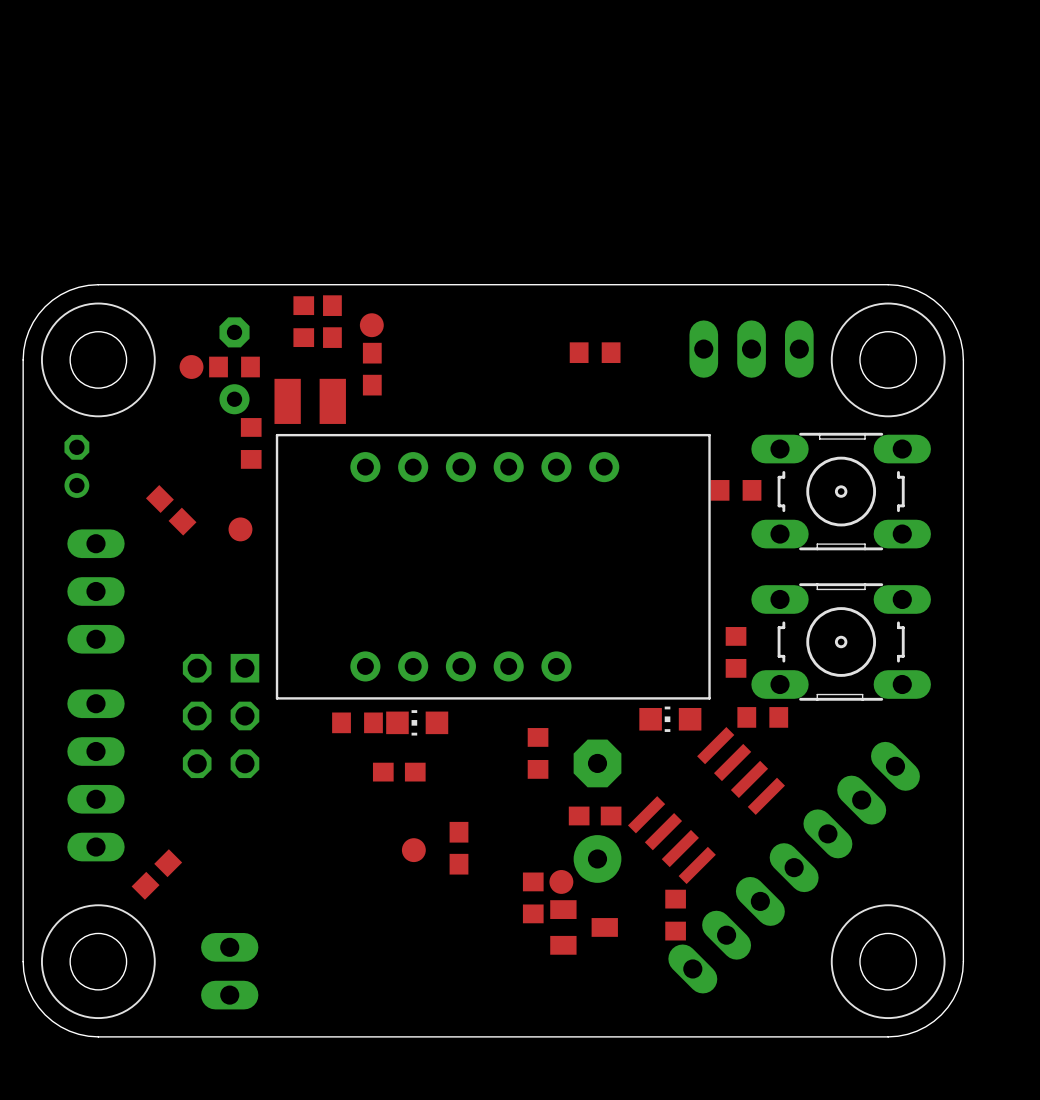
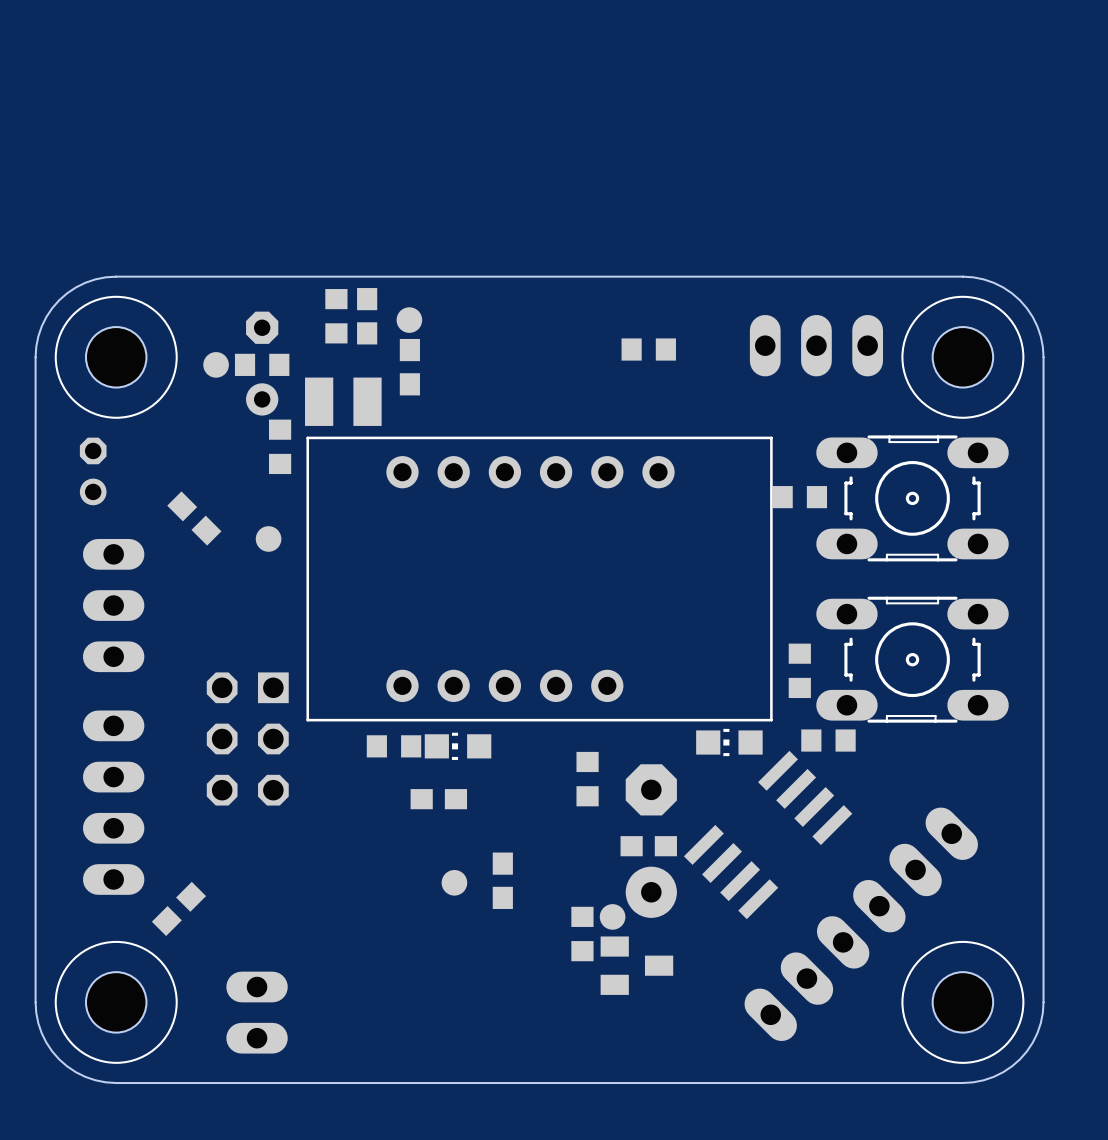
part: (794, 867) -> none
part: none -> (861, 924)
part: (675, 915) -> none

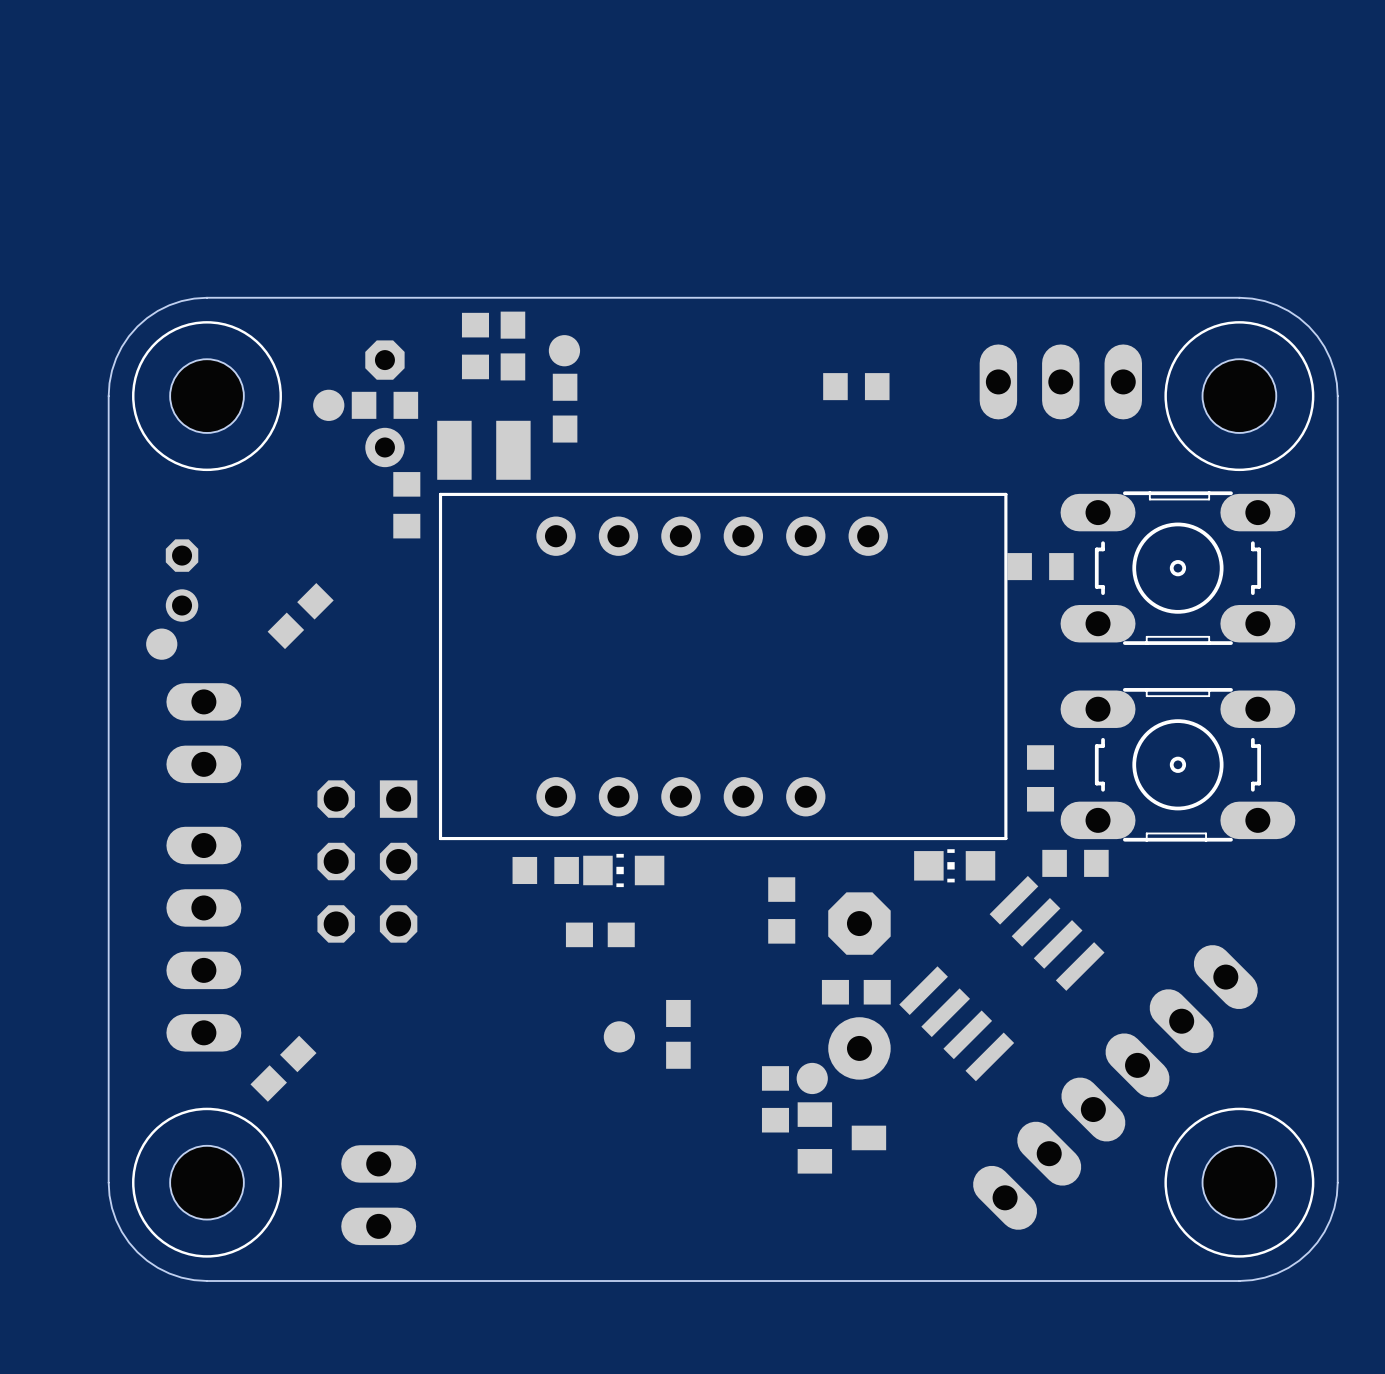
part position: (93, 471) -> (182, 580)
part rotation: 0° (194, 518) -> 90° clockwise (300, 616)
part position: (268, 538) -> (161, 644)
part: (113, 605) -> none
part: none -> (203, 733)

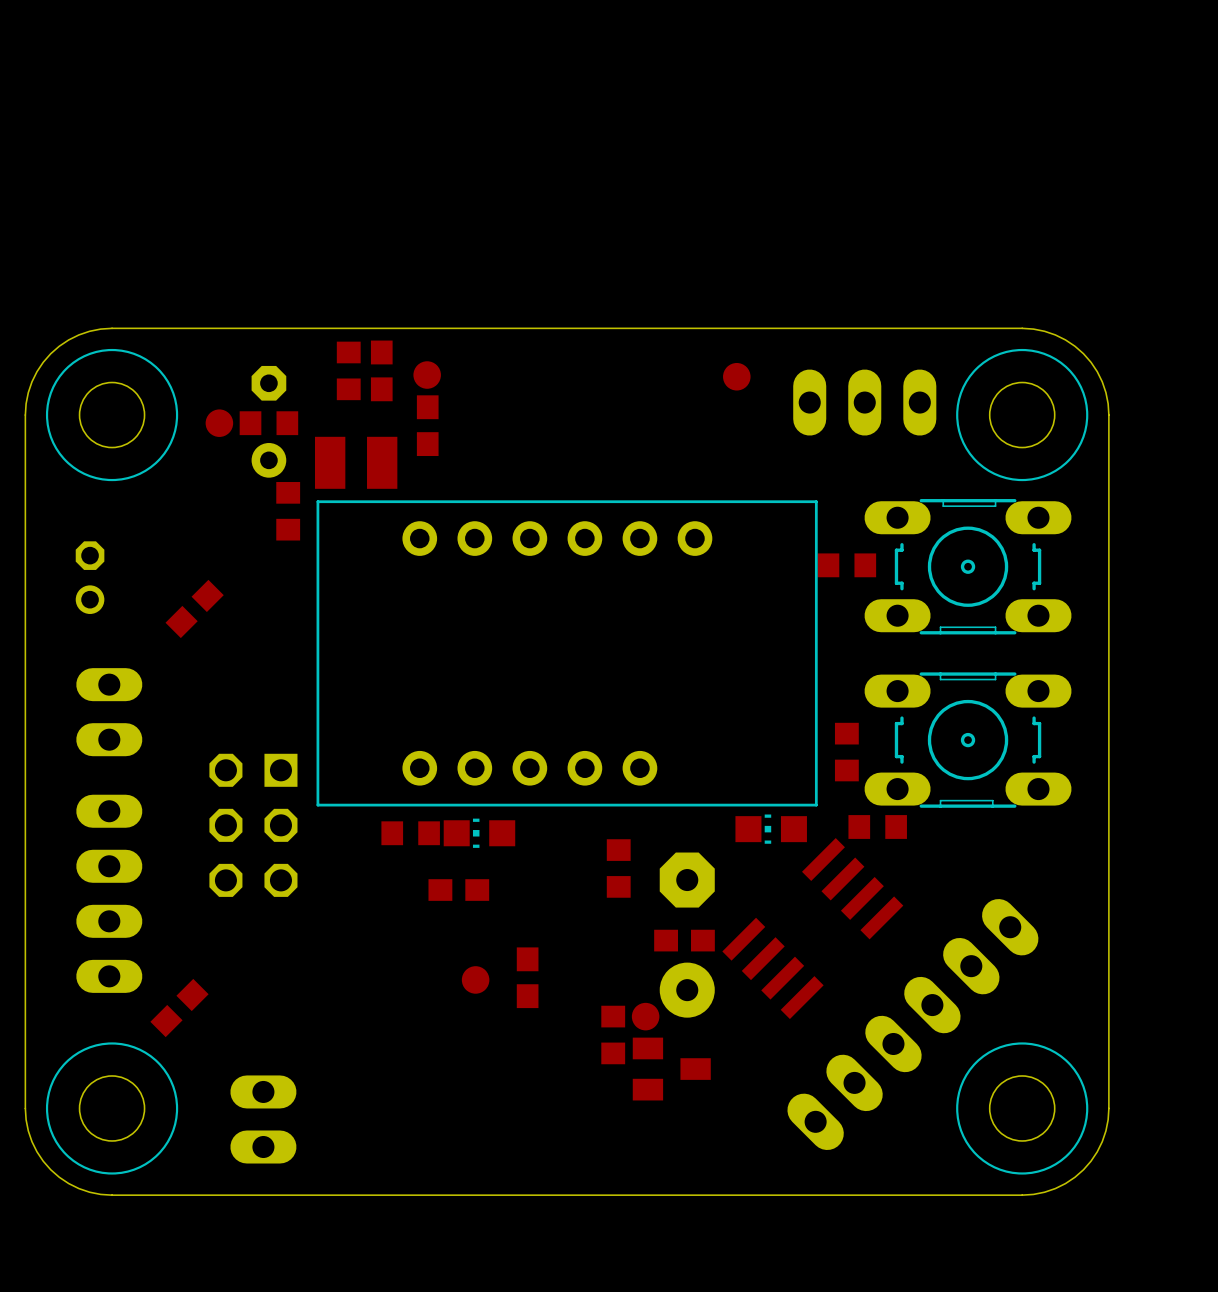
part: none -> (736, 376)
part: (856, 386) -> none
part: (161, 644) -> none

